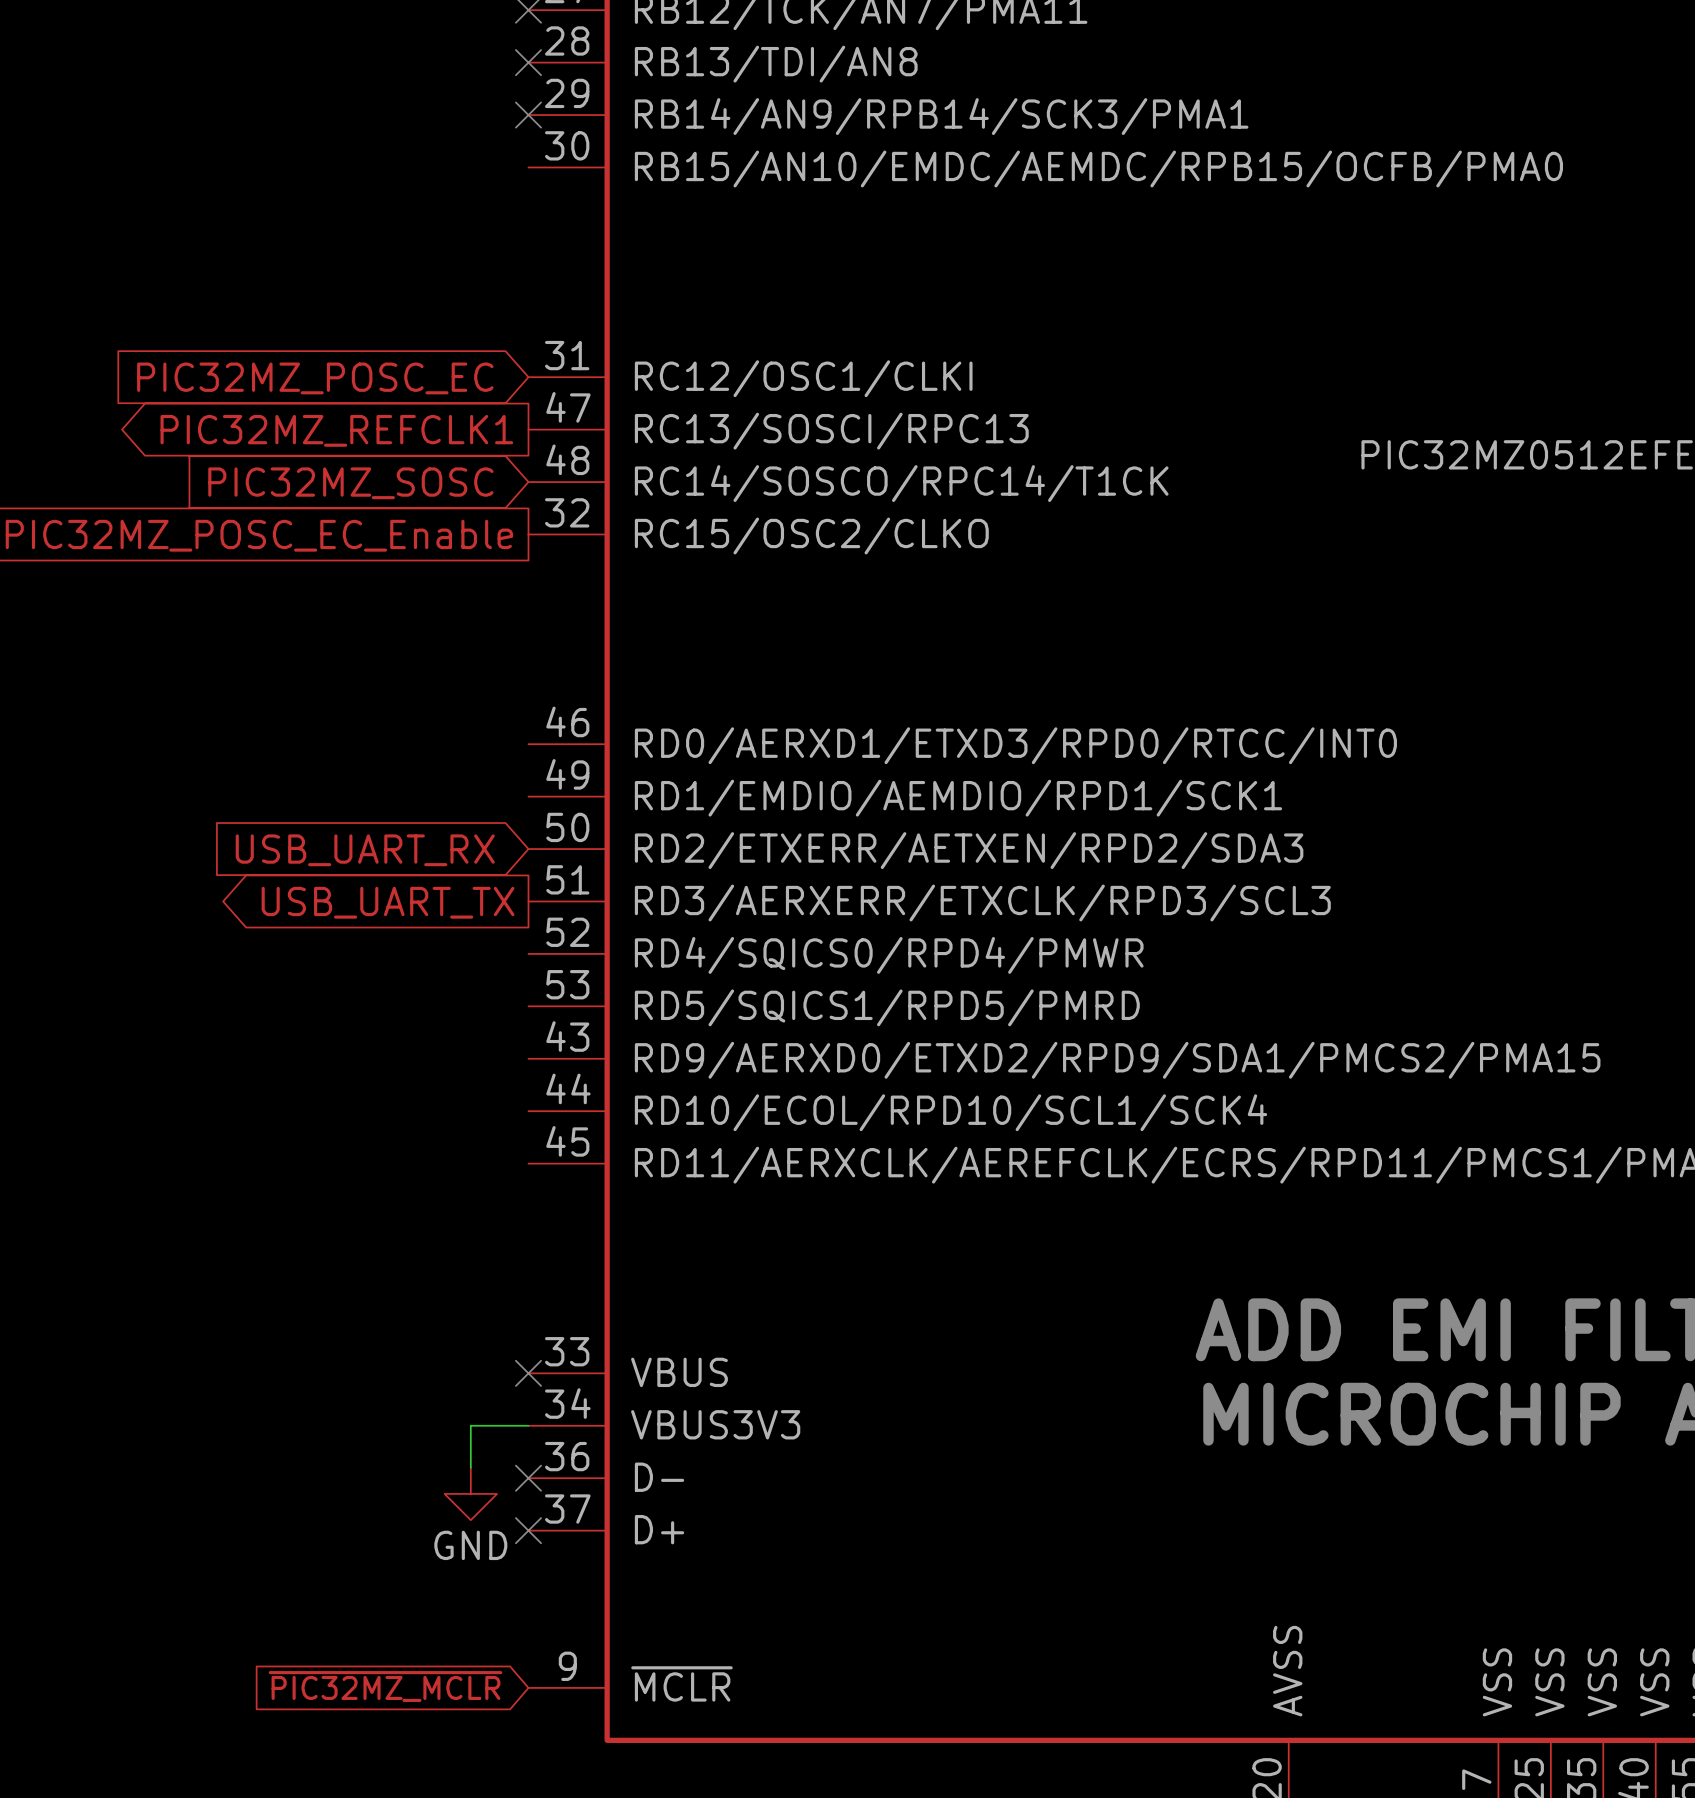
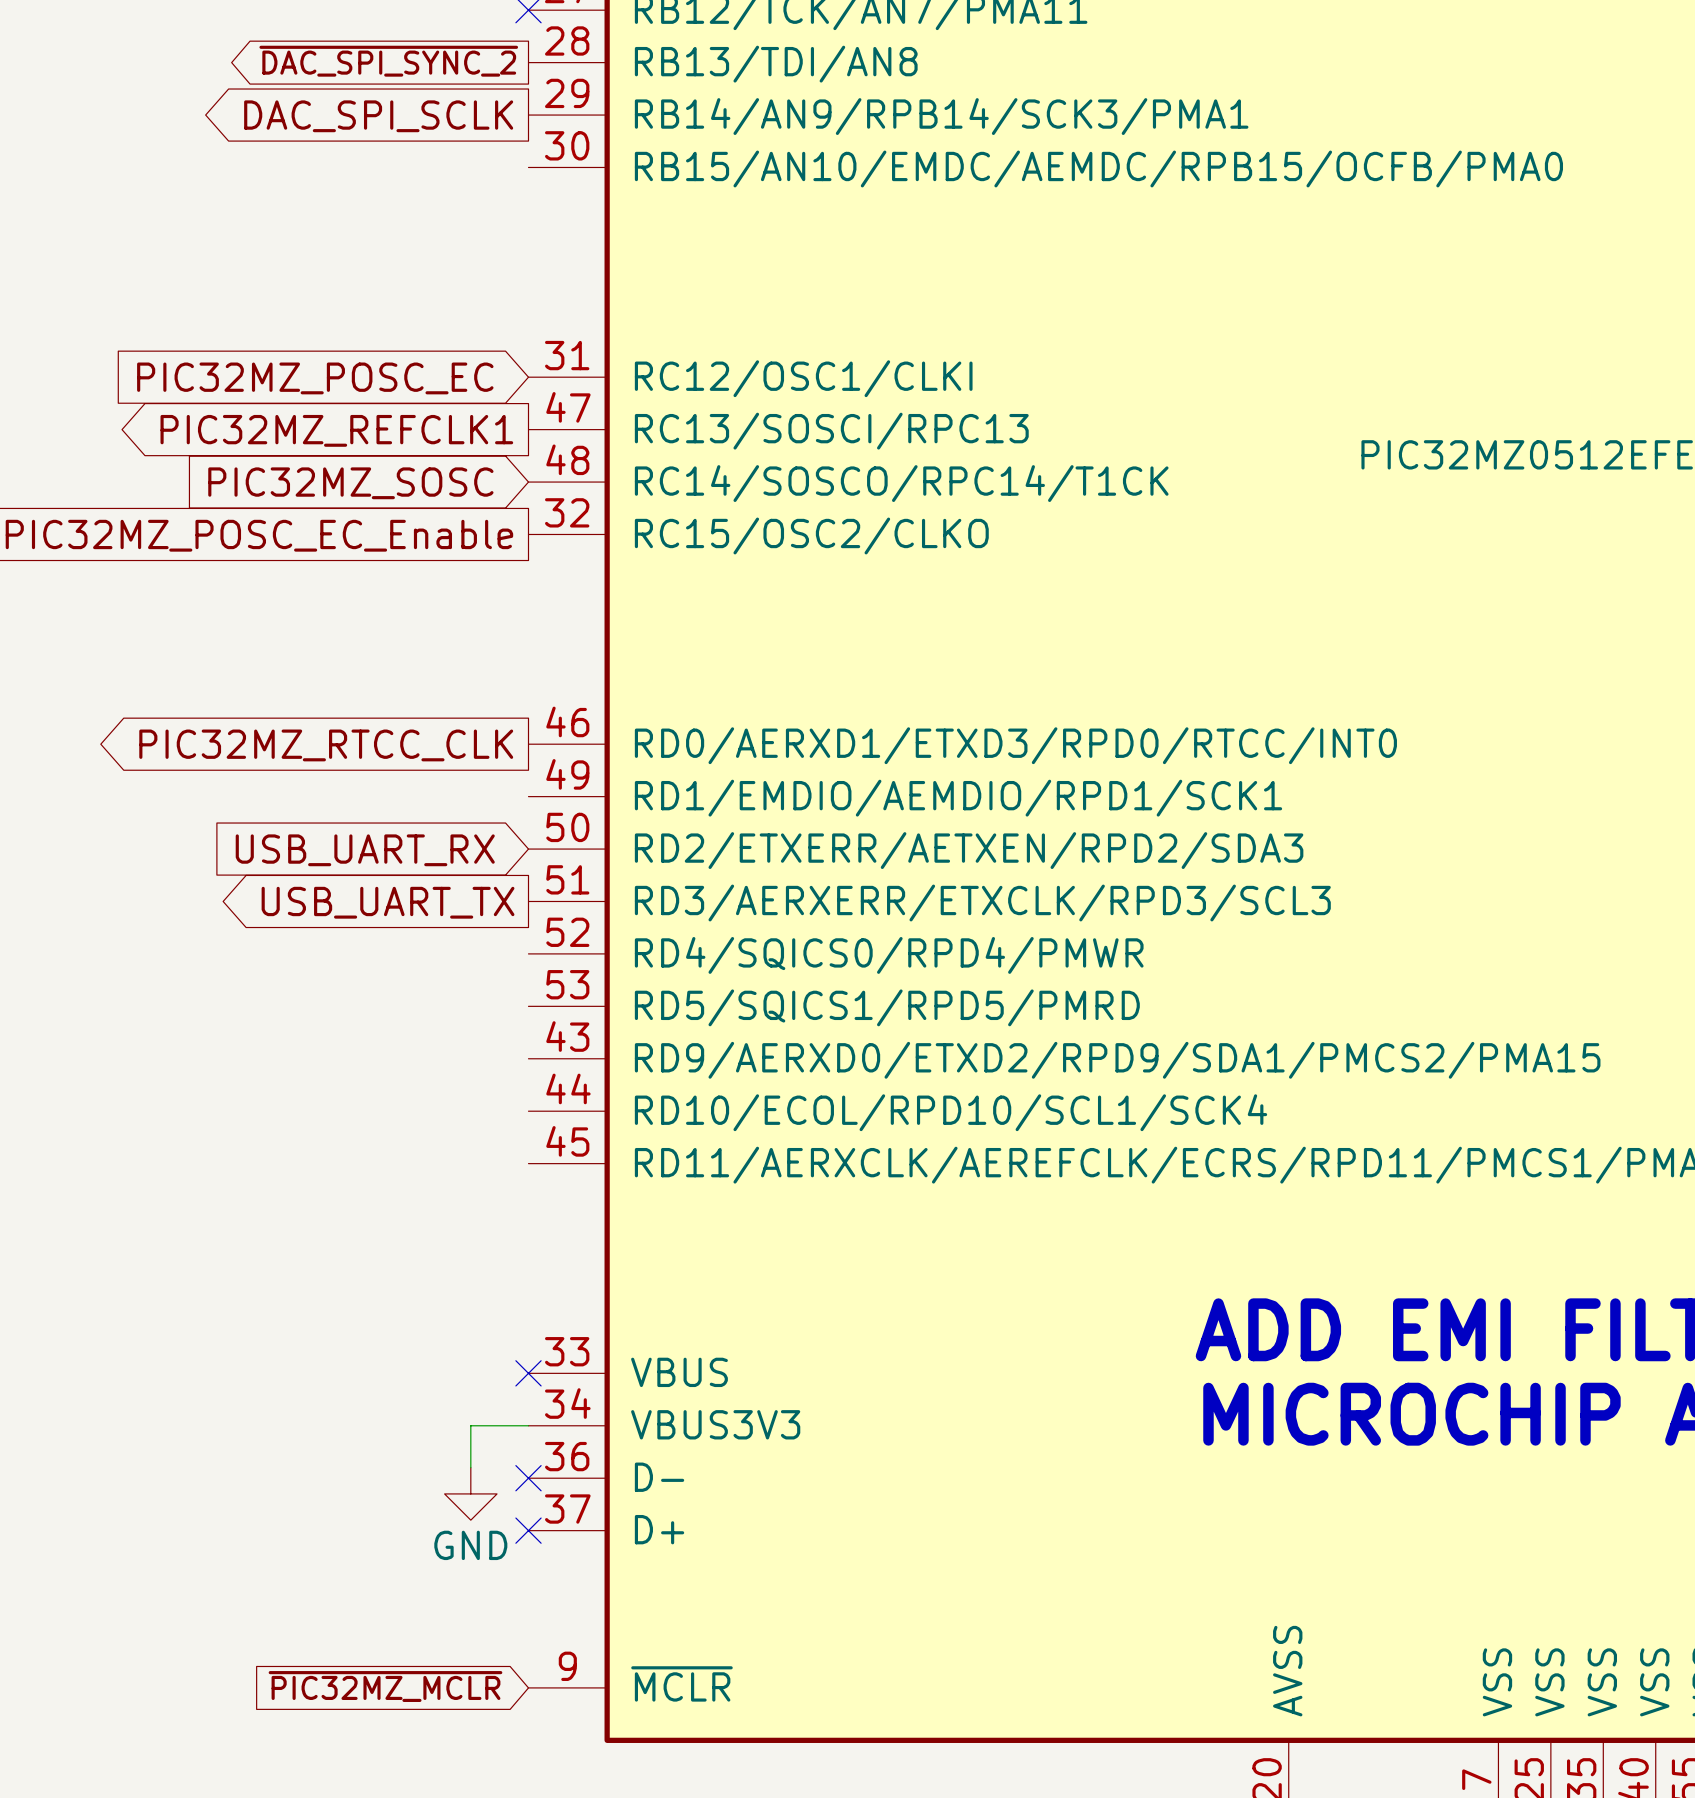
global label: none -> ~{DAC_SPI_SYNC_2} (388, 61)
no-connect mark: (528, 62) -> none
no-connect mark: (528, 115) -> none
global label: none -> DAC_SPI_SCLK (378, 116)
global label: none -> PIC32MZ_RTCC_CLK (326, 745)

